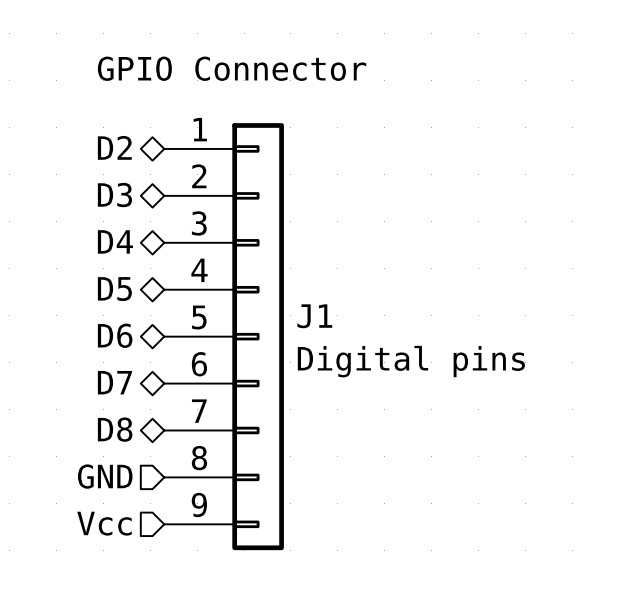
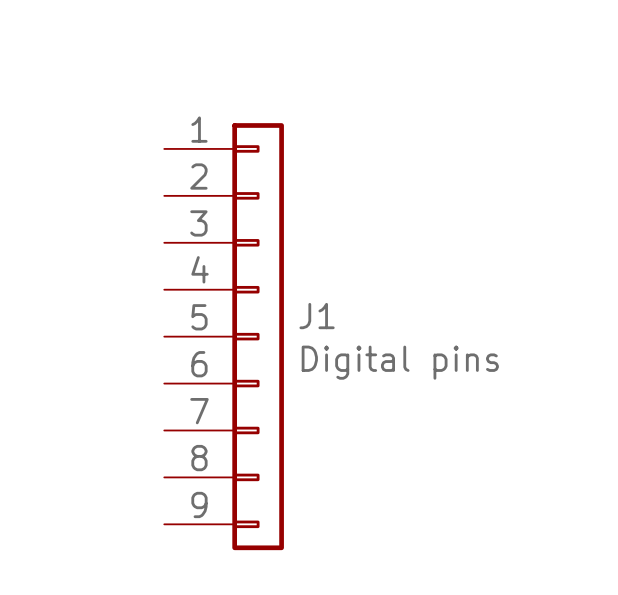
text: GPIO Connector (232, 68) -> none
hierarchical label: D2 (114, 147) -> none
hierarchical label: D3 (114, 195) -> none
hierarchical label: D4 (115, 241) -> none
hierarchical label: D5 (114, 289) -> none
hierarchical label: D6 (115, 335) -> none
hierarchical label: D7 (114, 382) -> none
hierarchical label: D8 (115, 429) -> none
hierarchical label: GND (105, 476) -> none
hierarchical label: Vcc (104, 523) -> none

